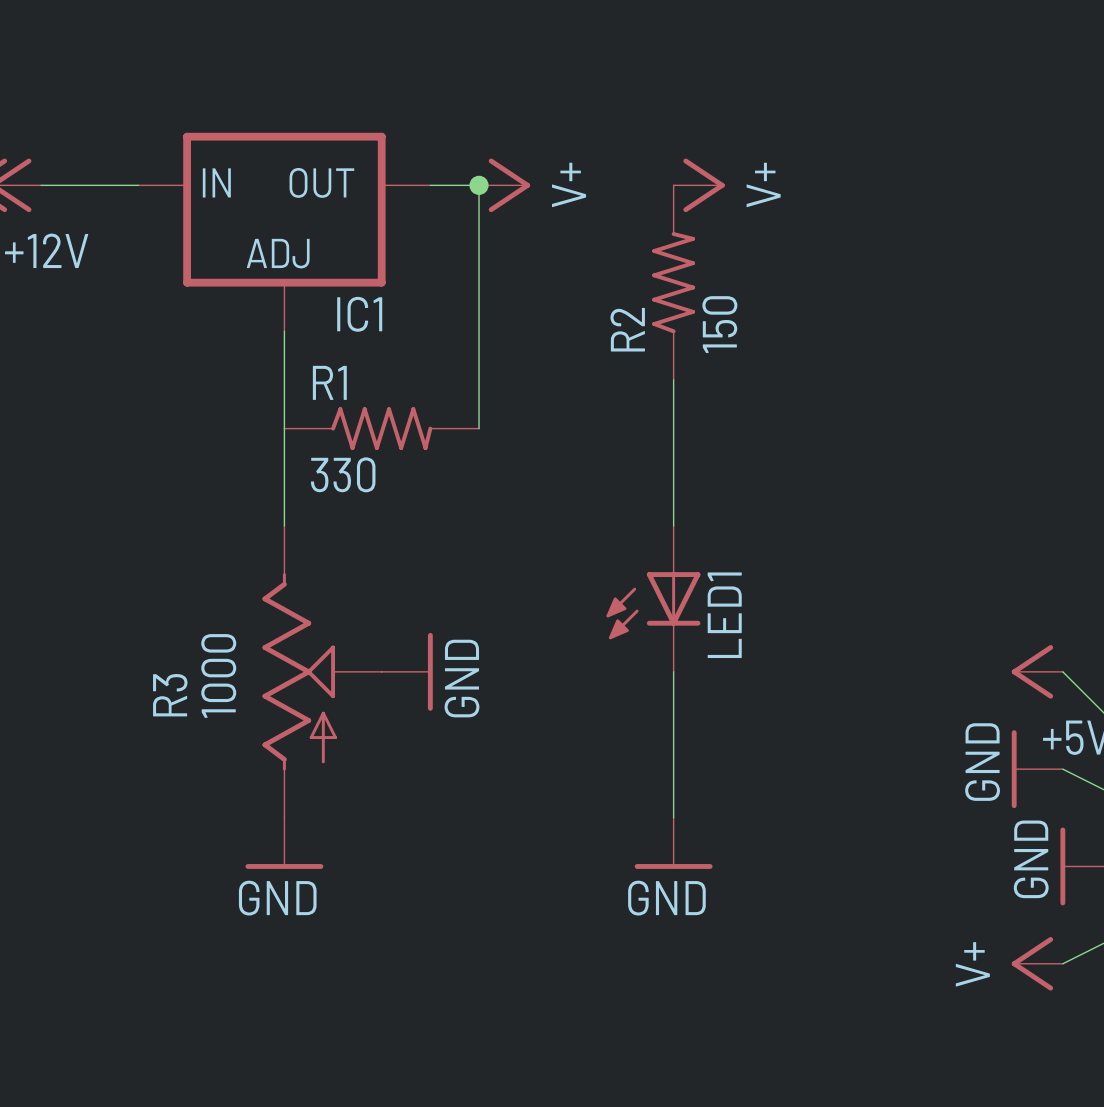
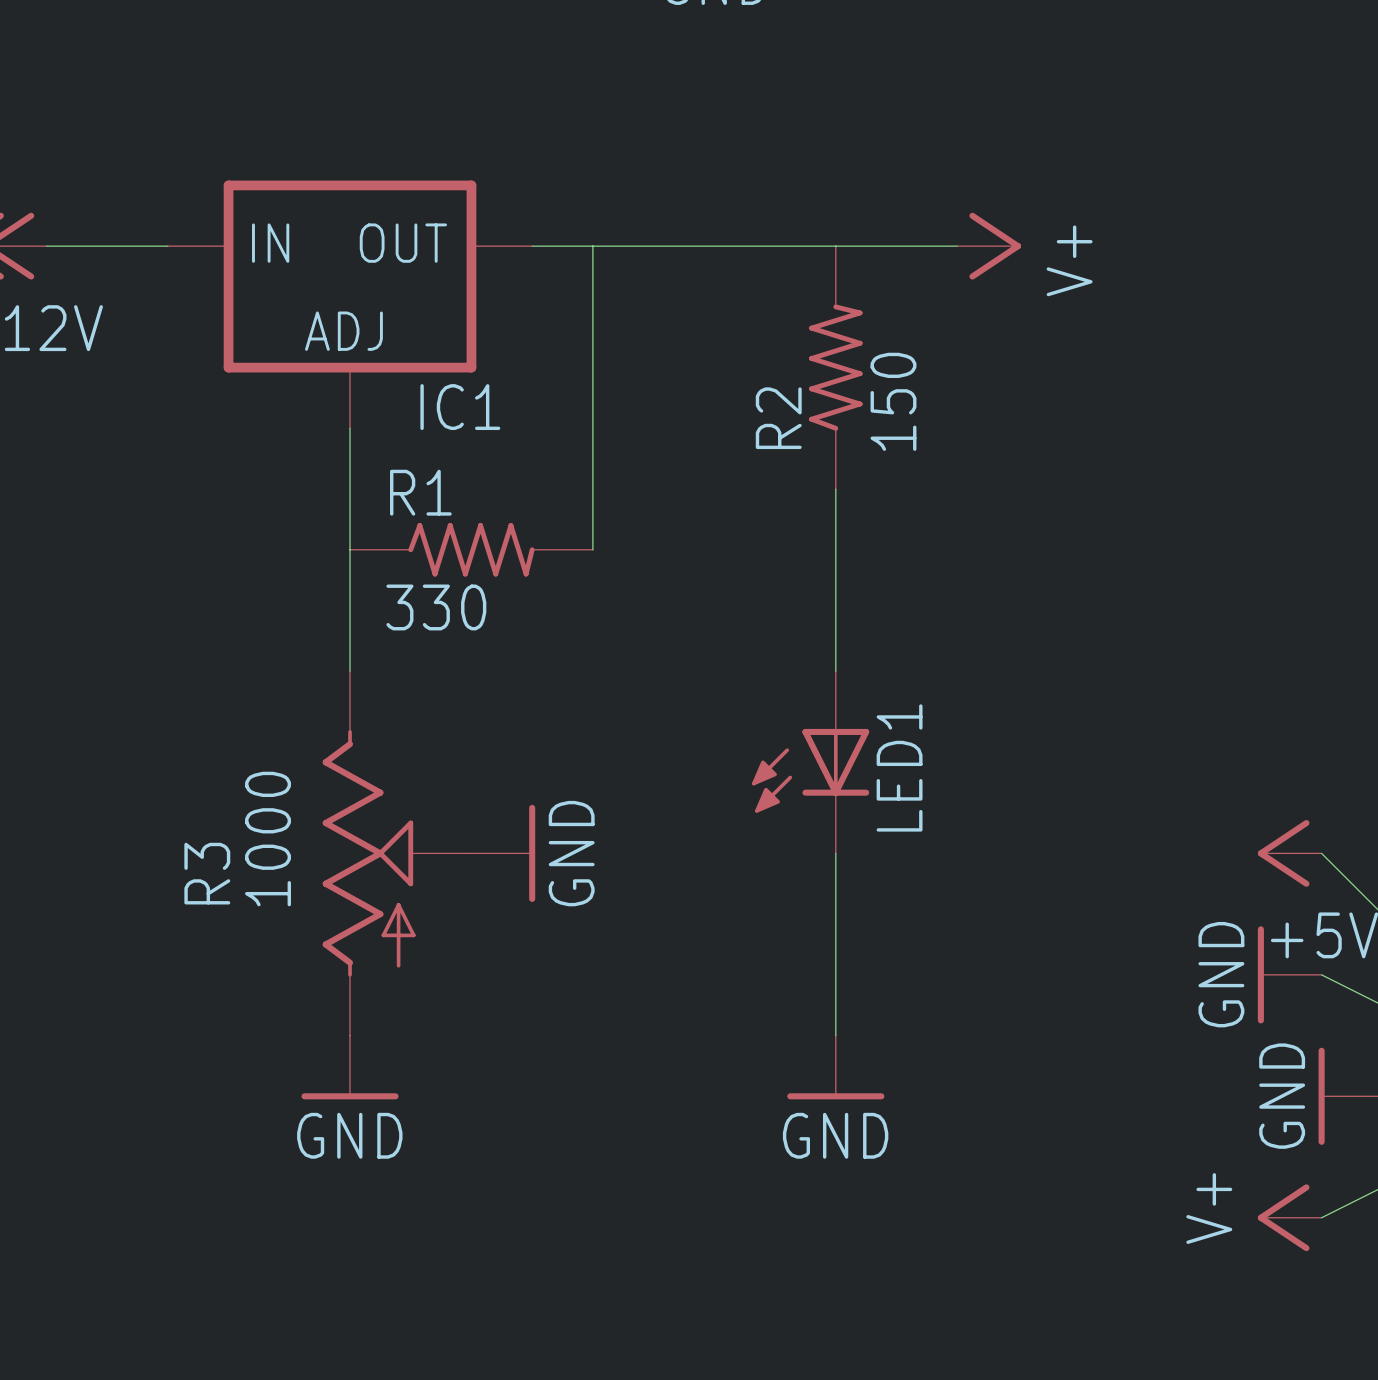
wire: none -> (592, 246) (957, 246)
junction: (479, 185) -> none
power symbol: V+ (504, 185) -> none
power symbol position: V+ (699, 185) -> V+ (989, 246)

